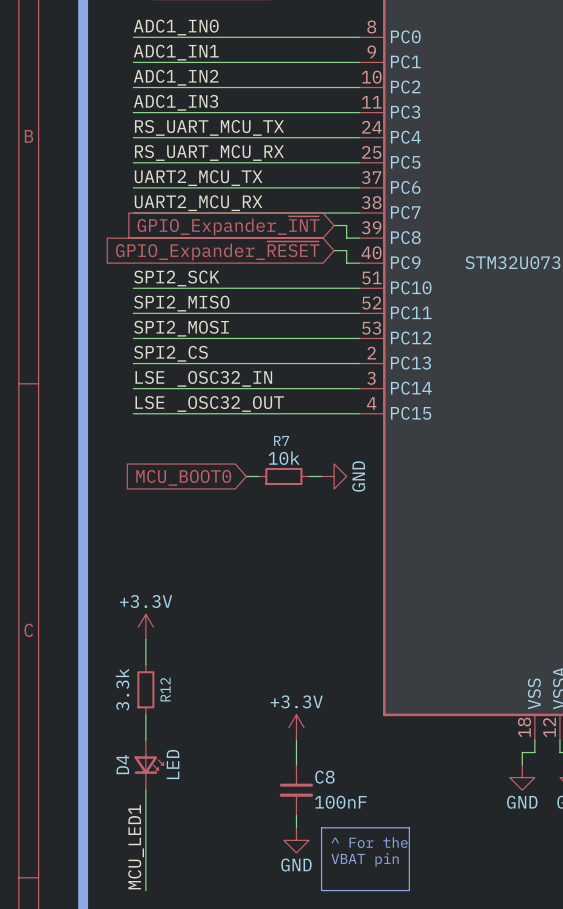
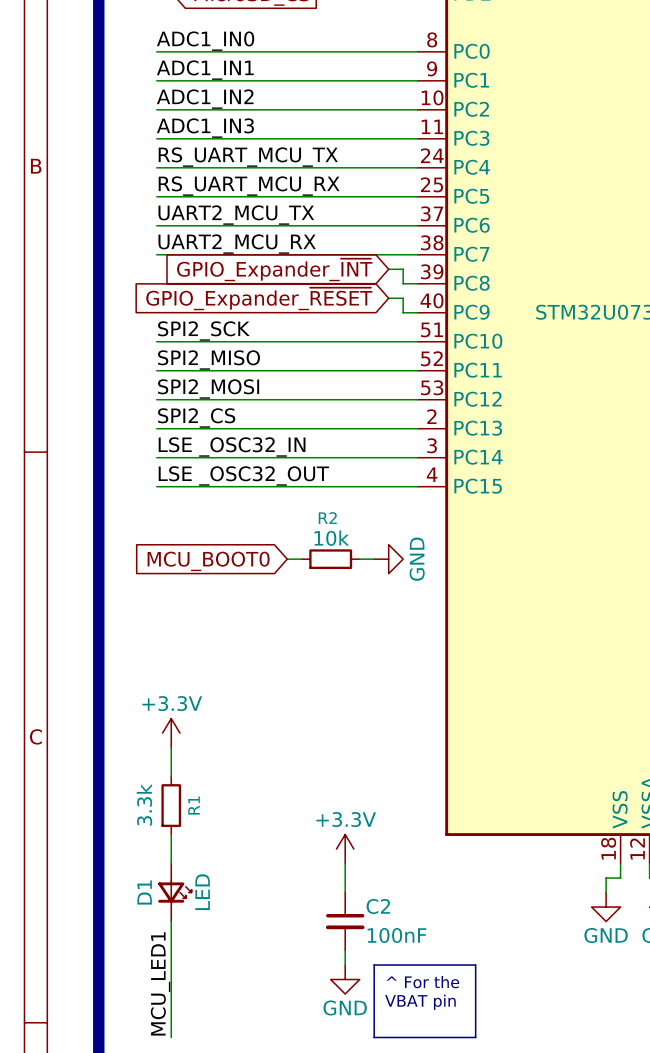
R7 name: R7 (281, 440) -> R2 (327, 518)
R12 name: R12 (165, 689) -> R1 (194, 805)
D4 name: D4 (122, 764) -> D1 (144, 892)
C8 name: C8 (324, 777) -> C2 (378, 906)

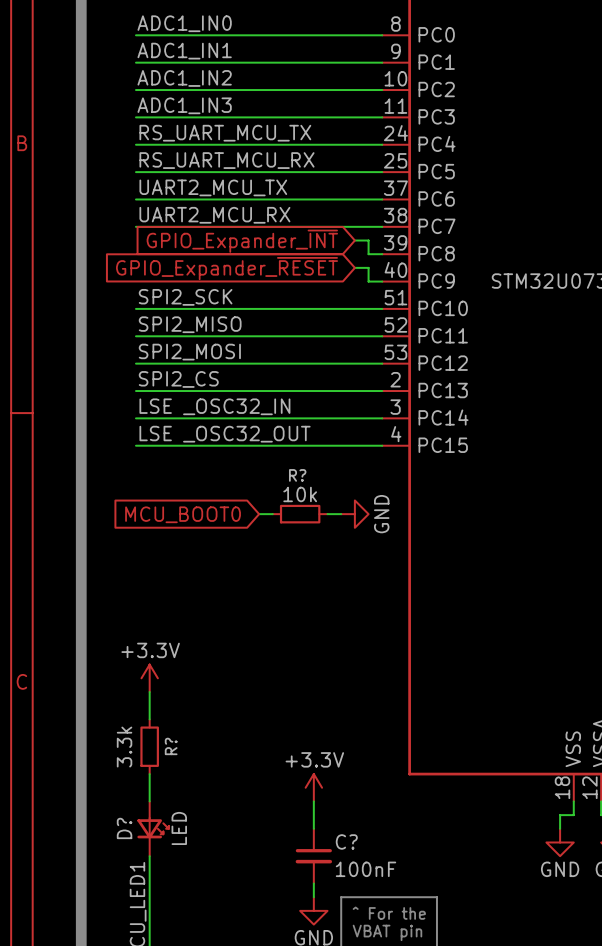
R2 name: R2 (327, 518) -> R? (297, 475)
R1 name: R1 (194, 805) -> R? (171, 746)
D1 name: D1 (144, 892) -> D? (124, 828)
C2 name: C2 (378, 906) -> C? (346, 841)

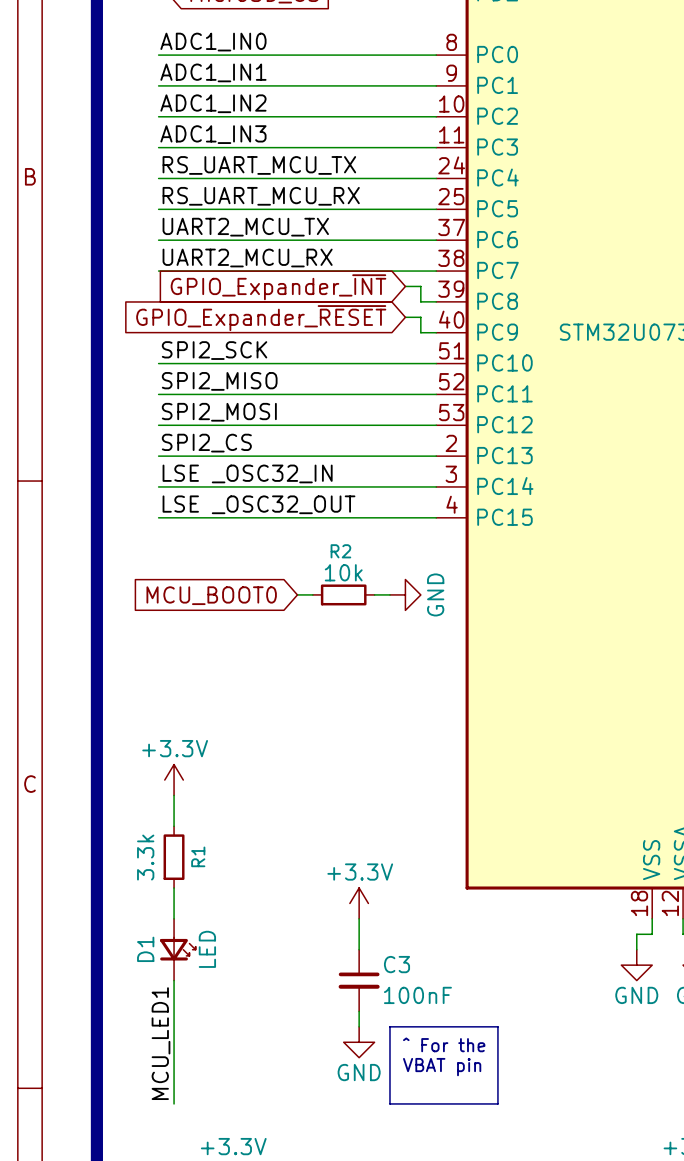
R? name: R? (297, 475) -> R2 (340, 551)
R? name: R? (171, 746) -> R1 (198, 856)
D? name: D? (124, 828) -> D1 (145, 949)
C? name: C? (346, 841) -> C3 (397, 964)

